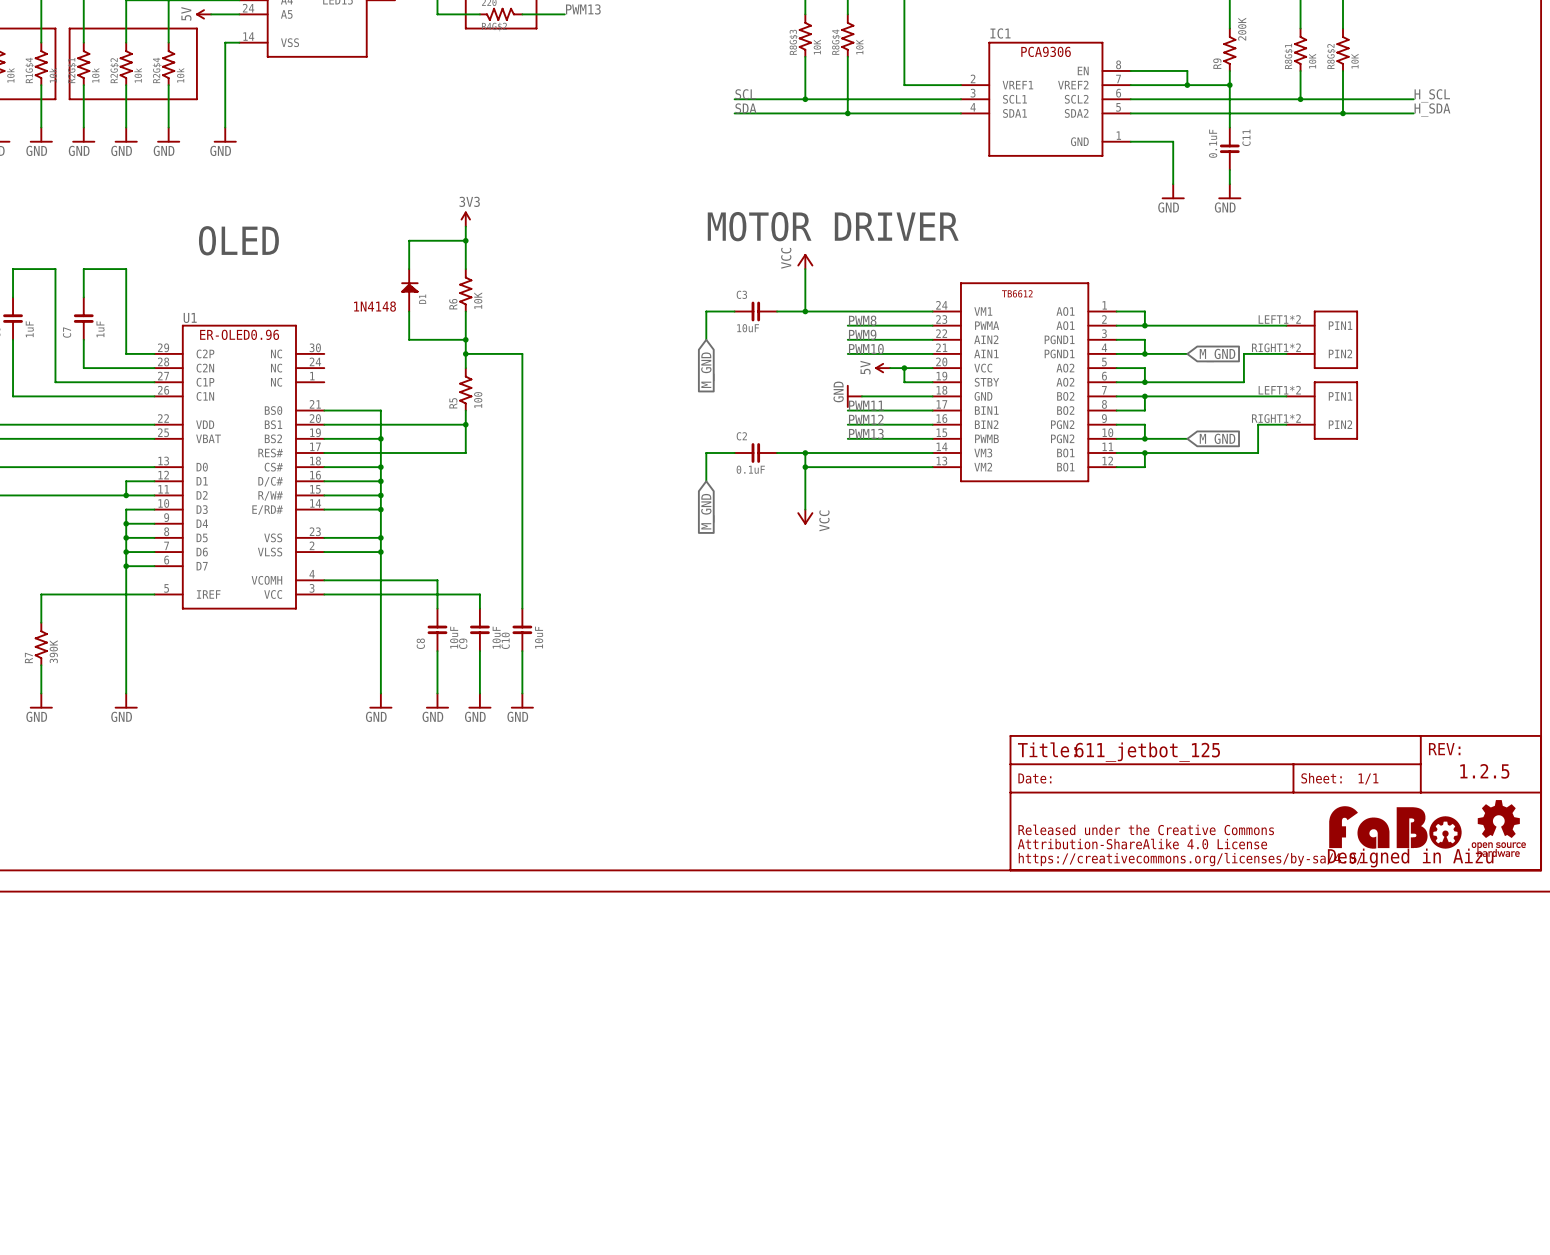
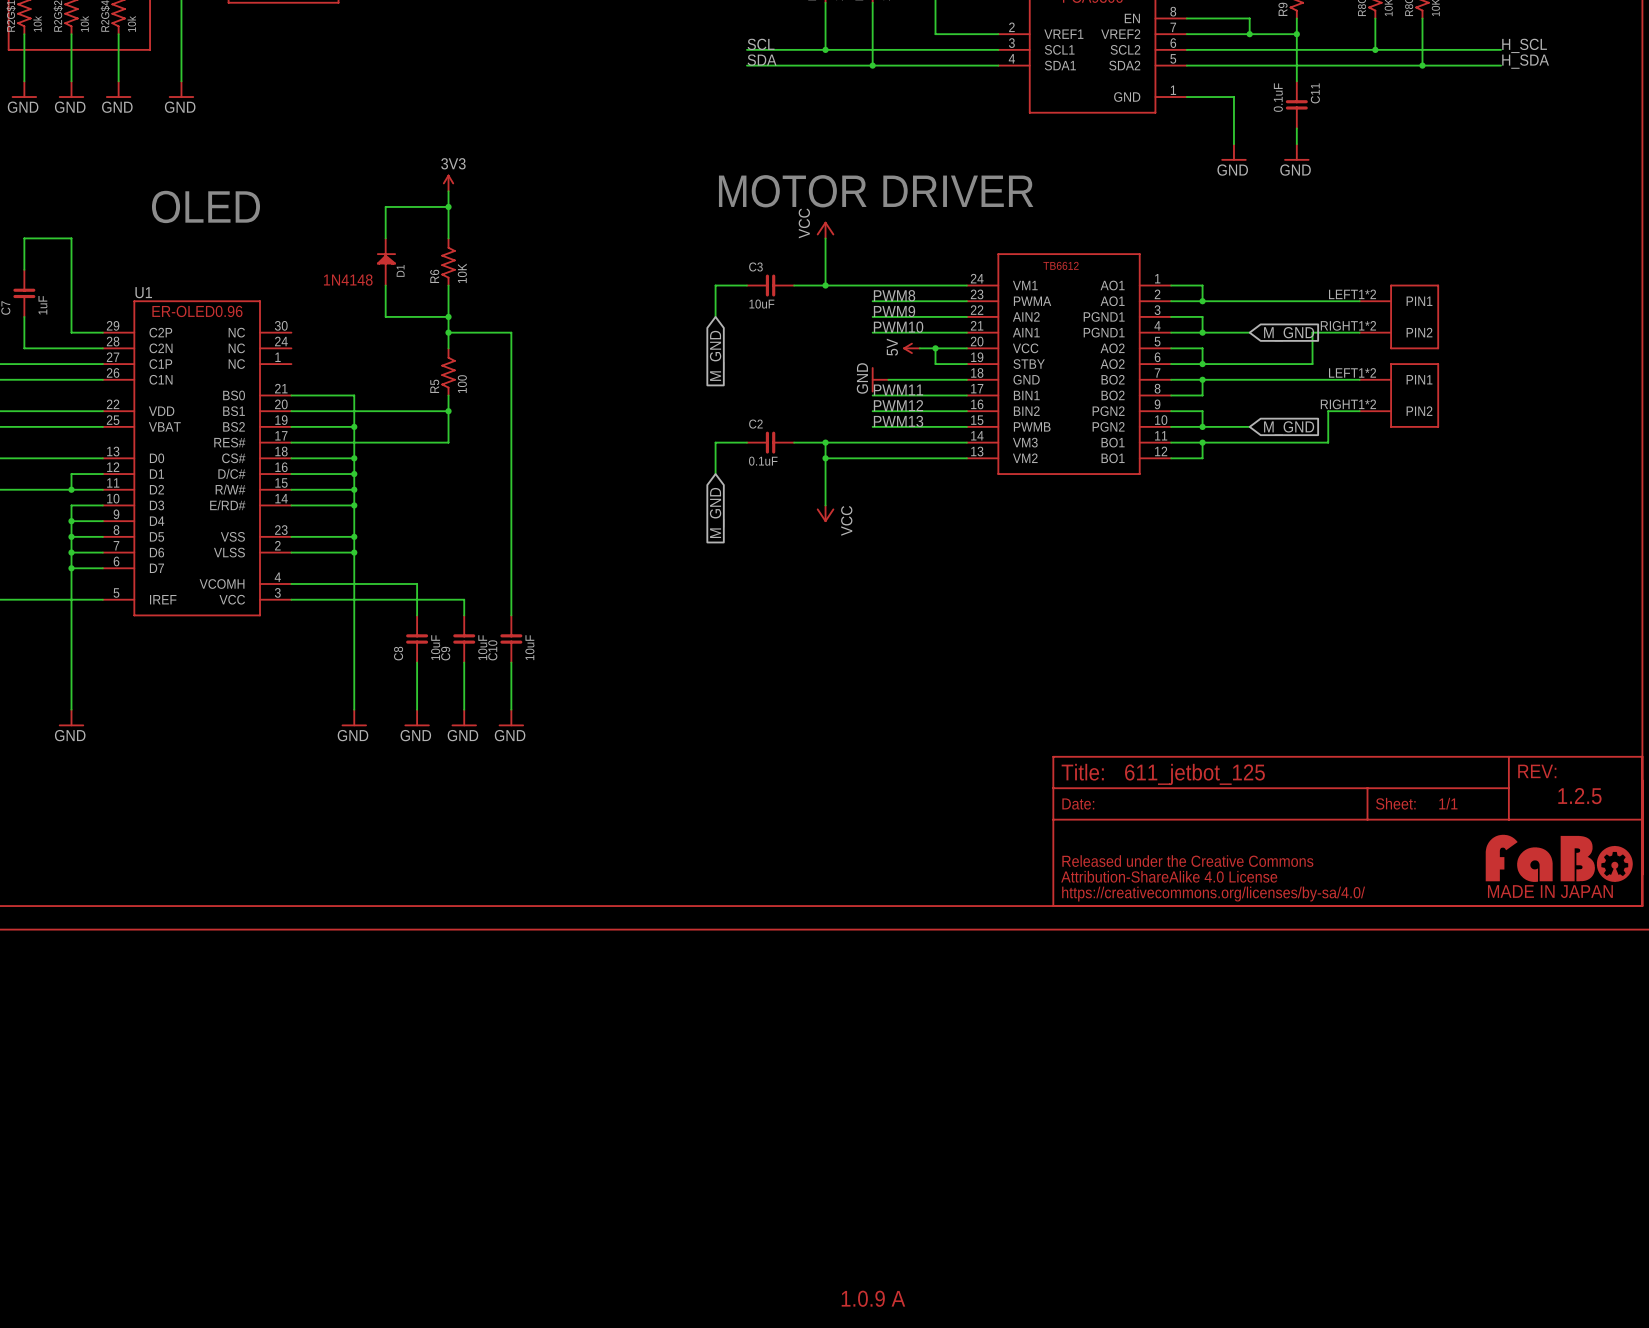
part: (1395, 827) -> none
part: none -> (1559, 858)
part: (1498, 828) -> none
text: none -> 1.0.9 A (873, 1298)

